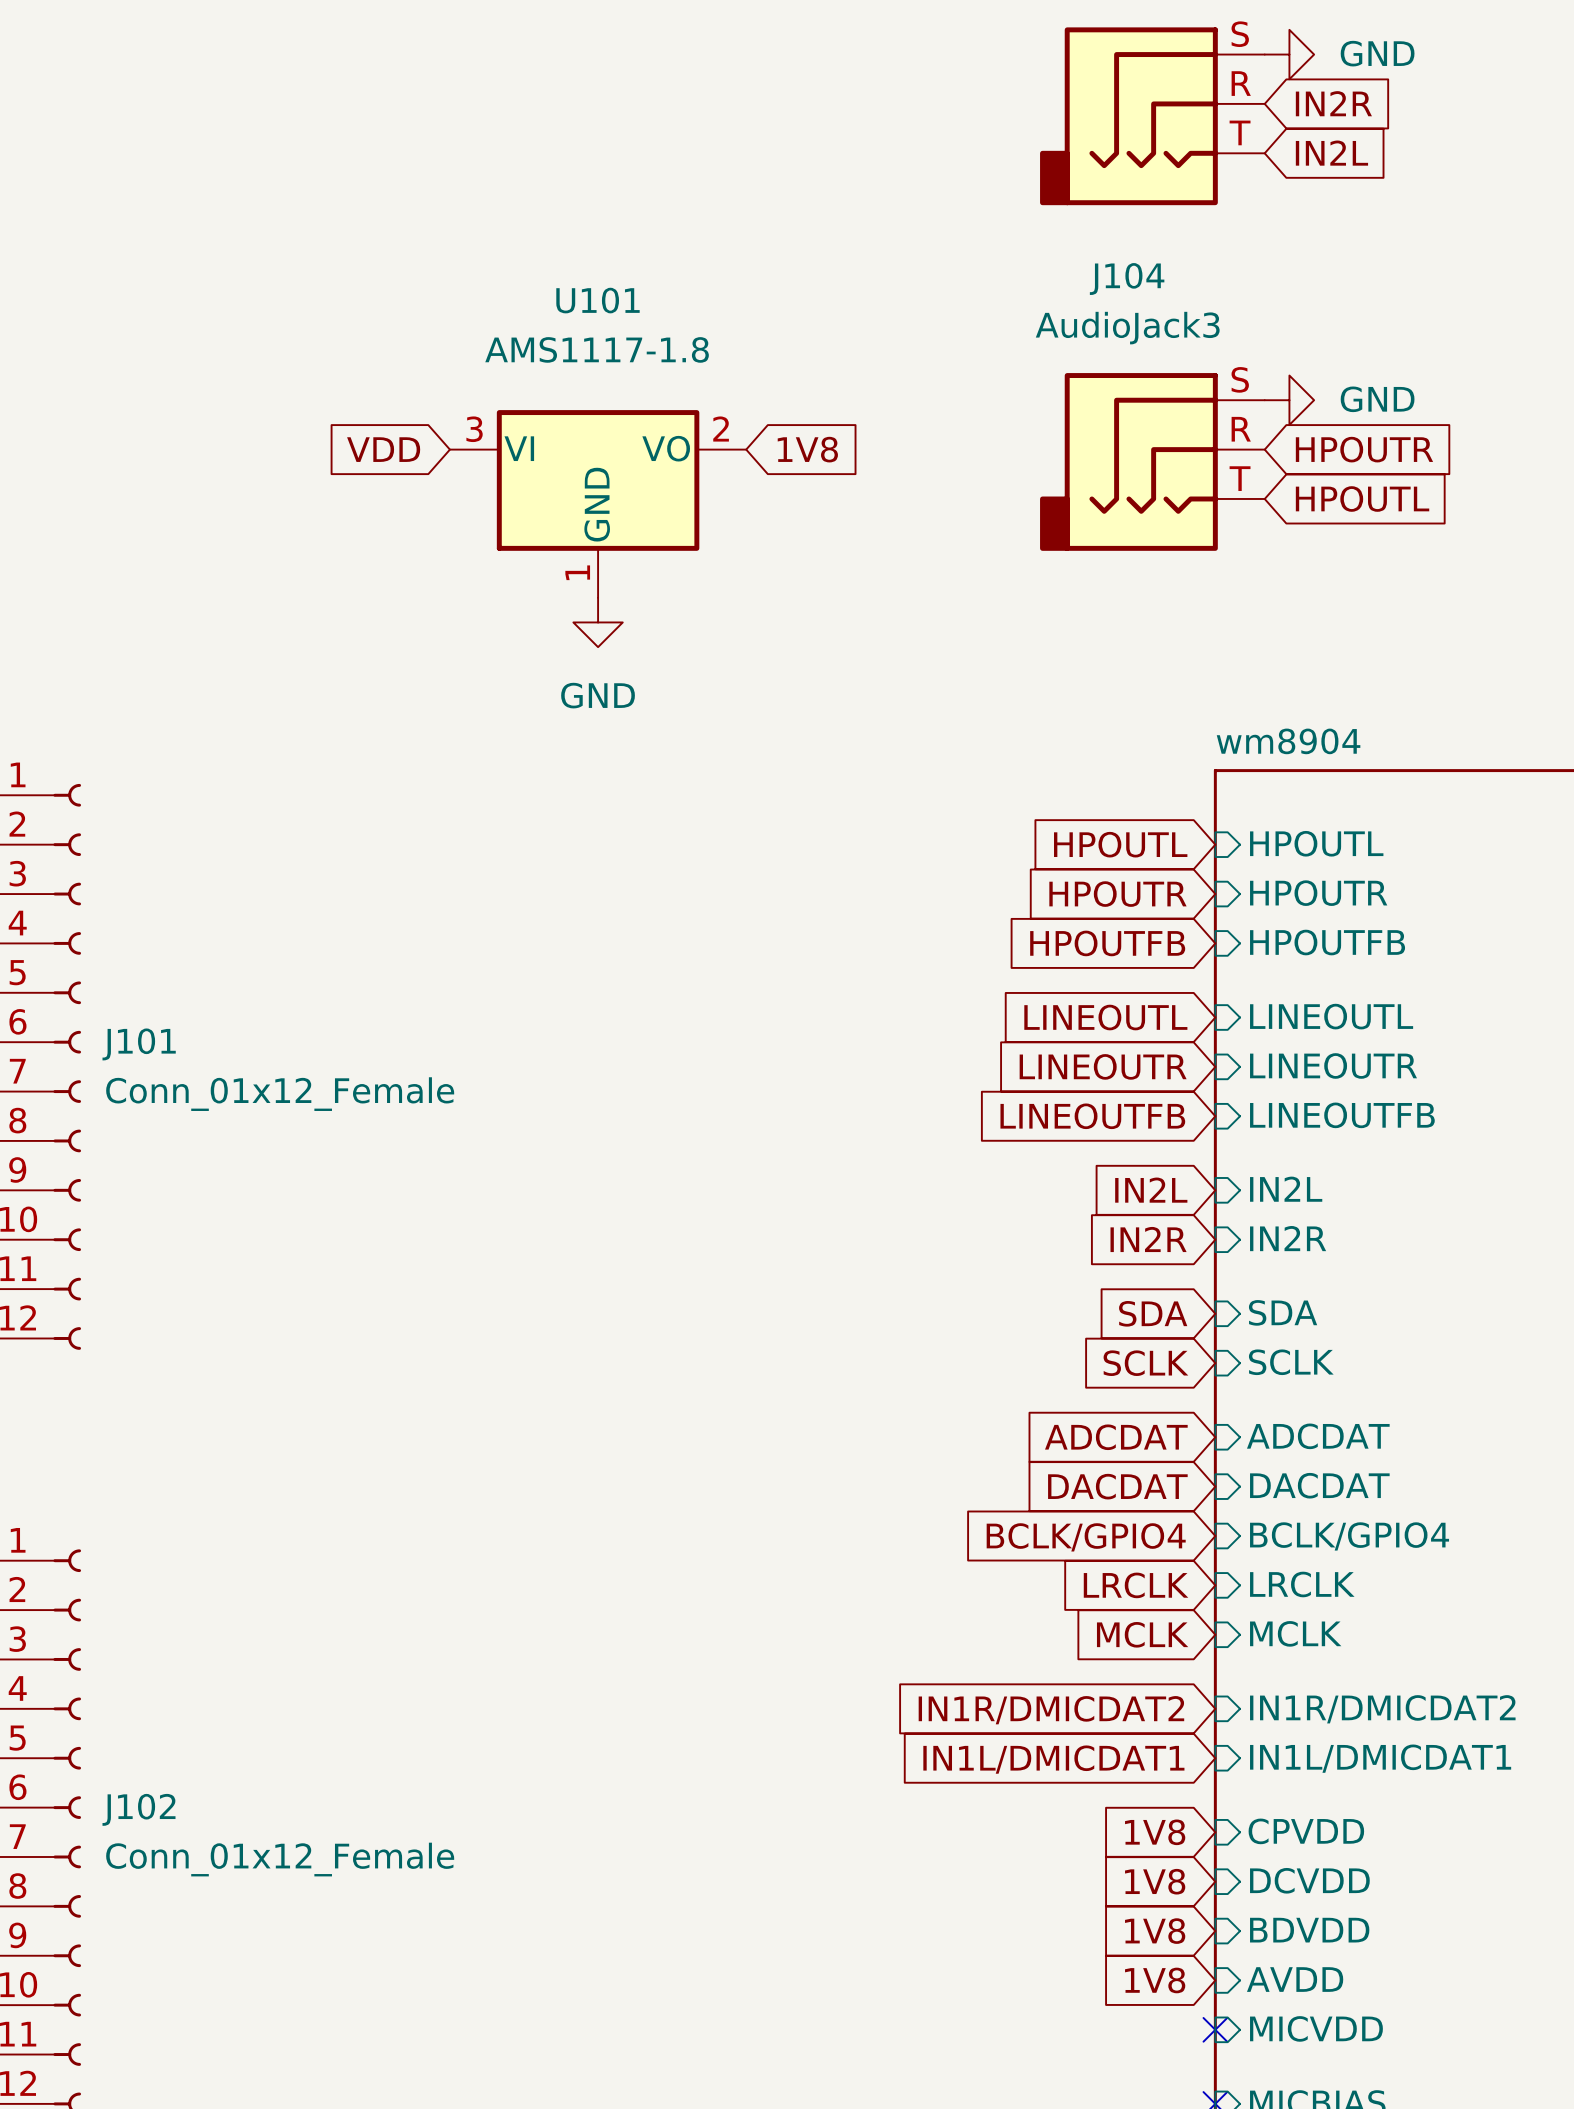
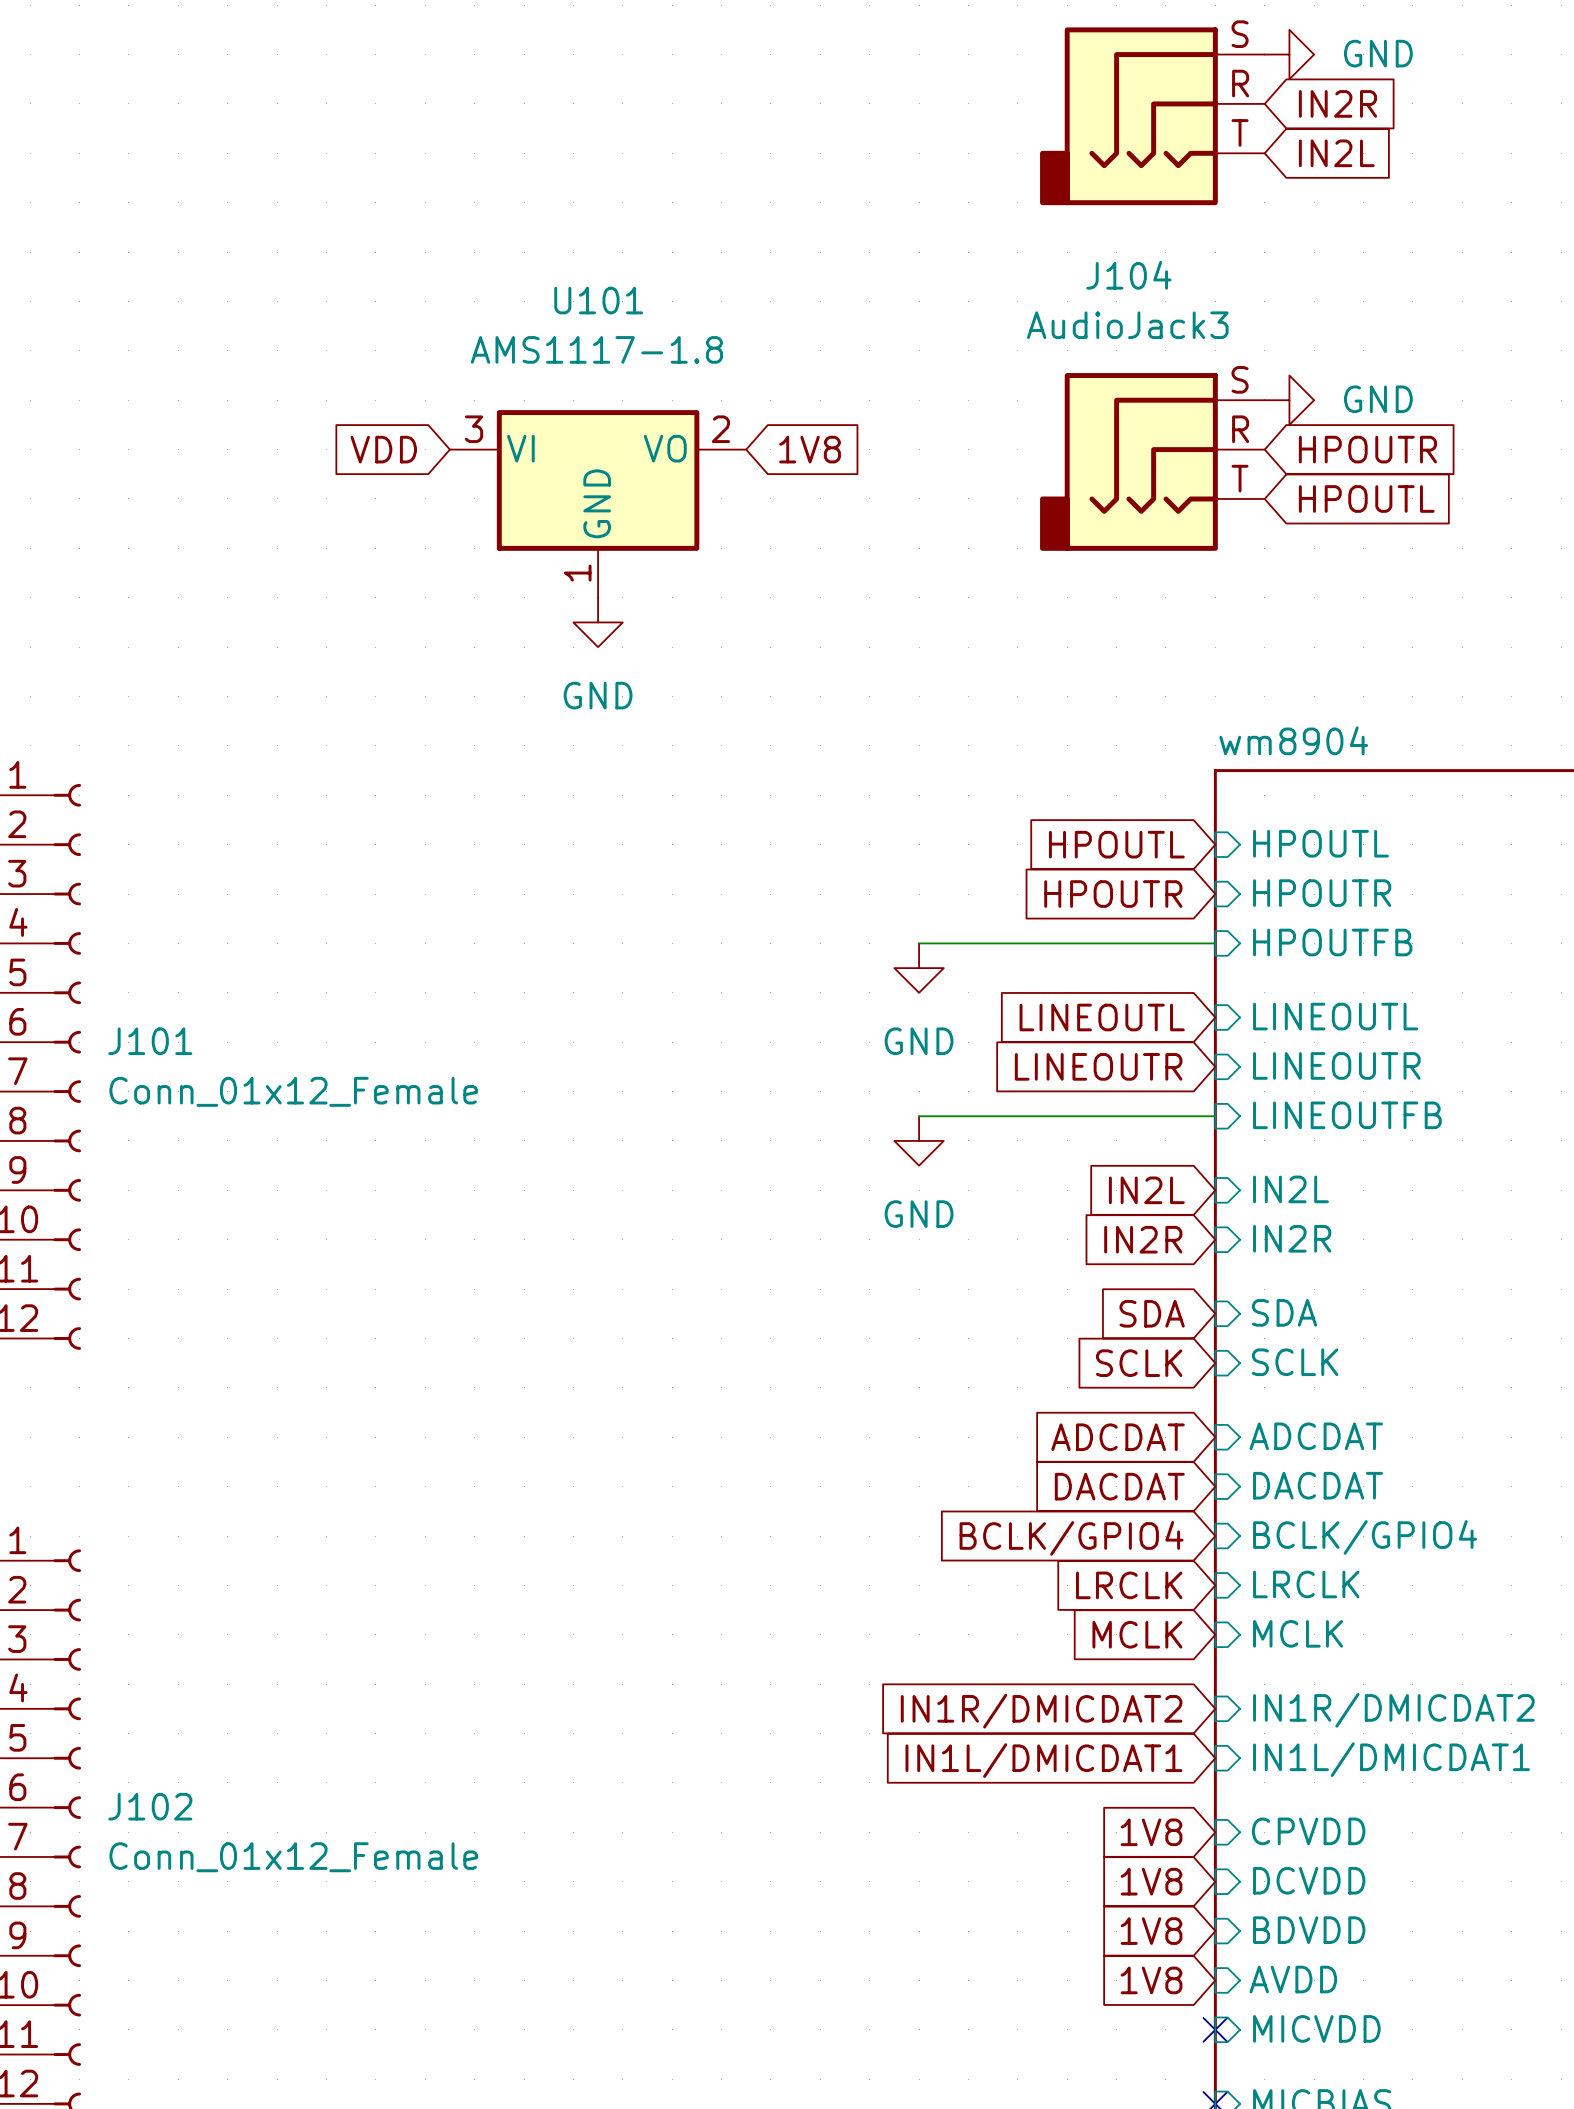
wire: none -> (919, 943) (1215, 943)
global label: HPOUTFB (1107, 943) -> none
power symbol: none -> GND (919, 968)
wire: none -> (919, 1116) (1215, 1116)
global label: LINEOUTFB (1092, 1116) -> none
power symbol: none -> GND (919, 1140)

